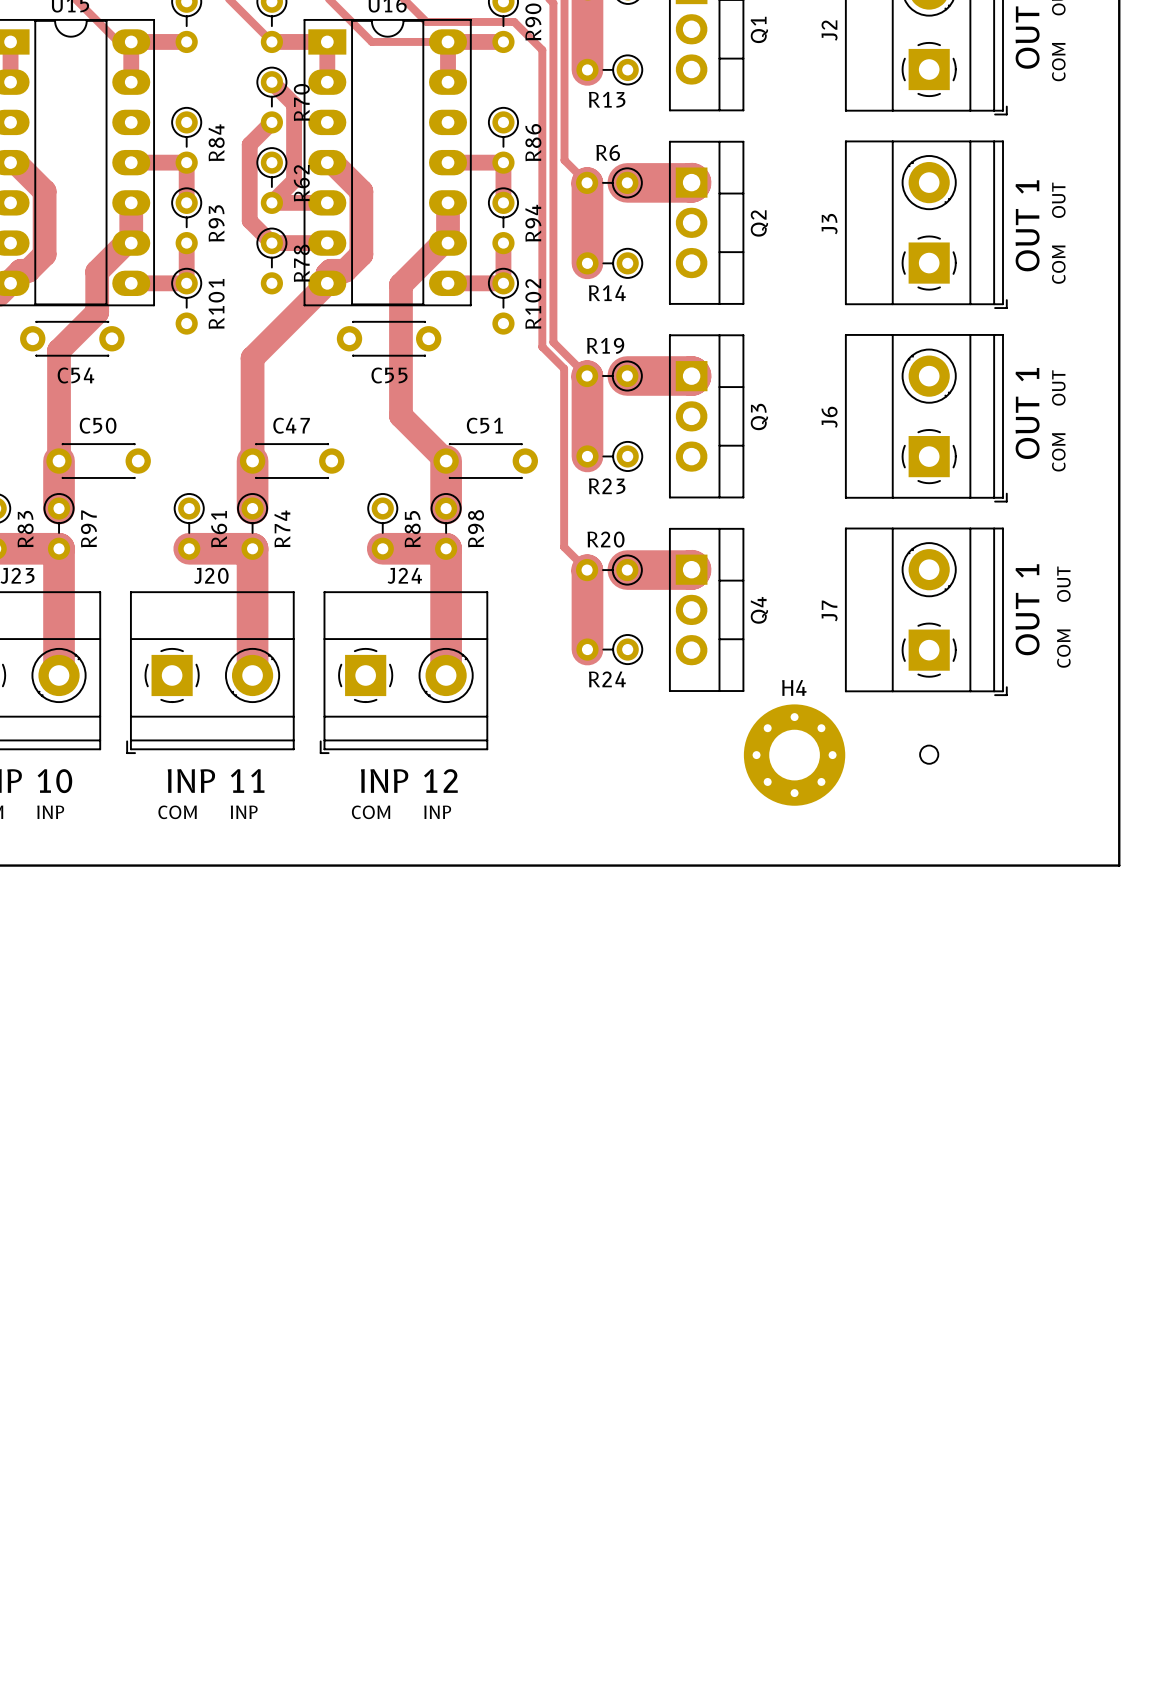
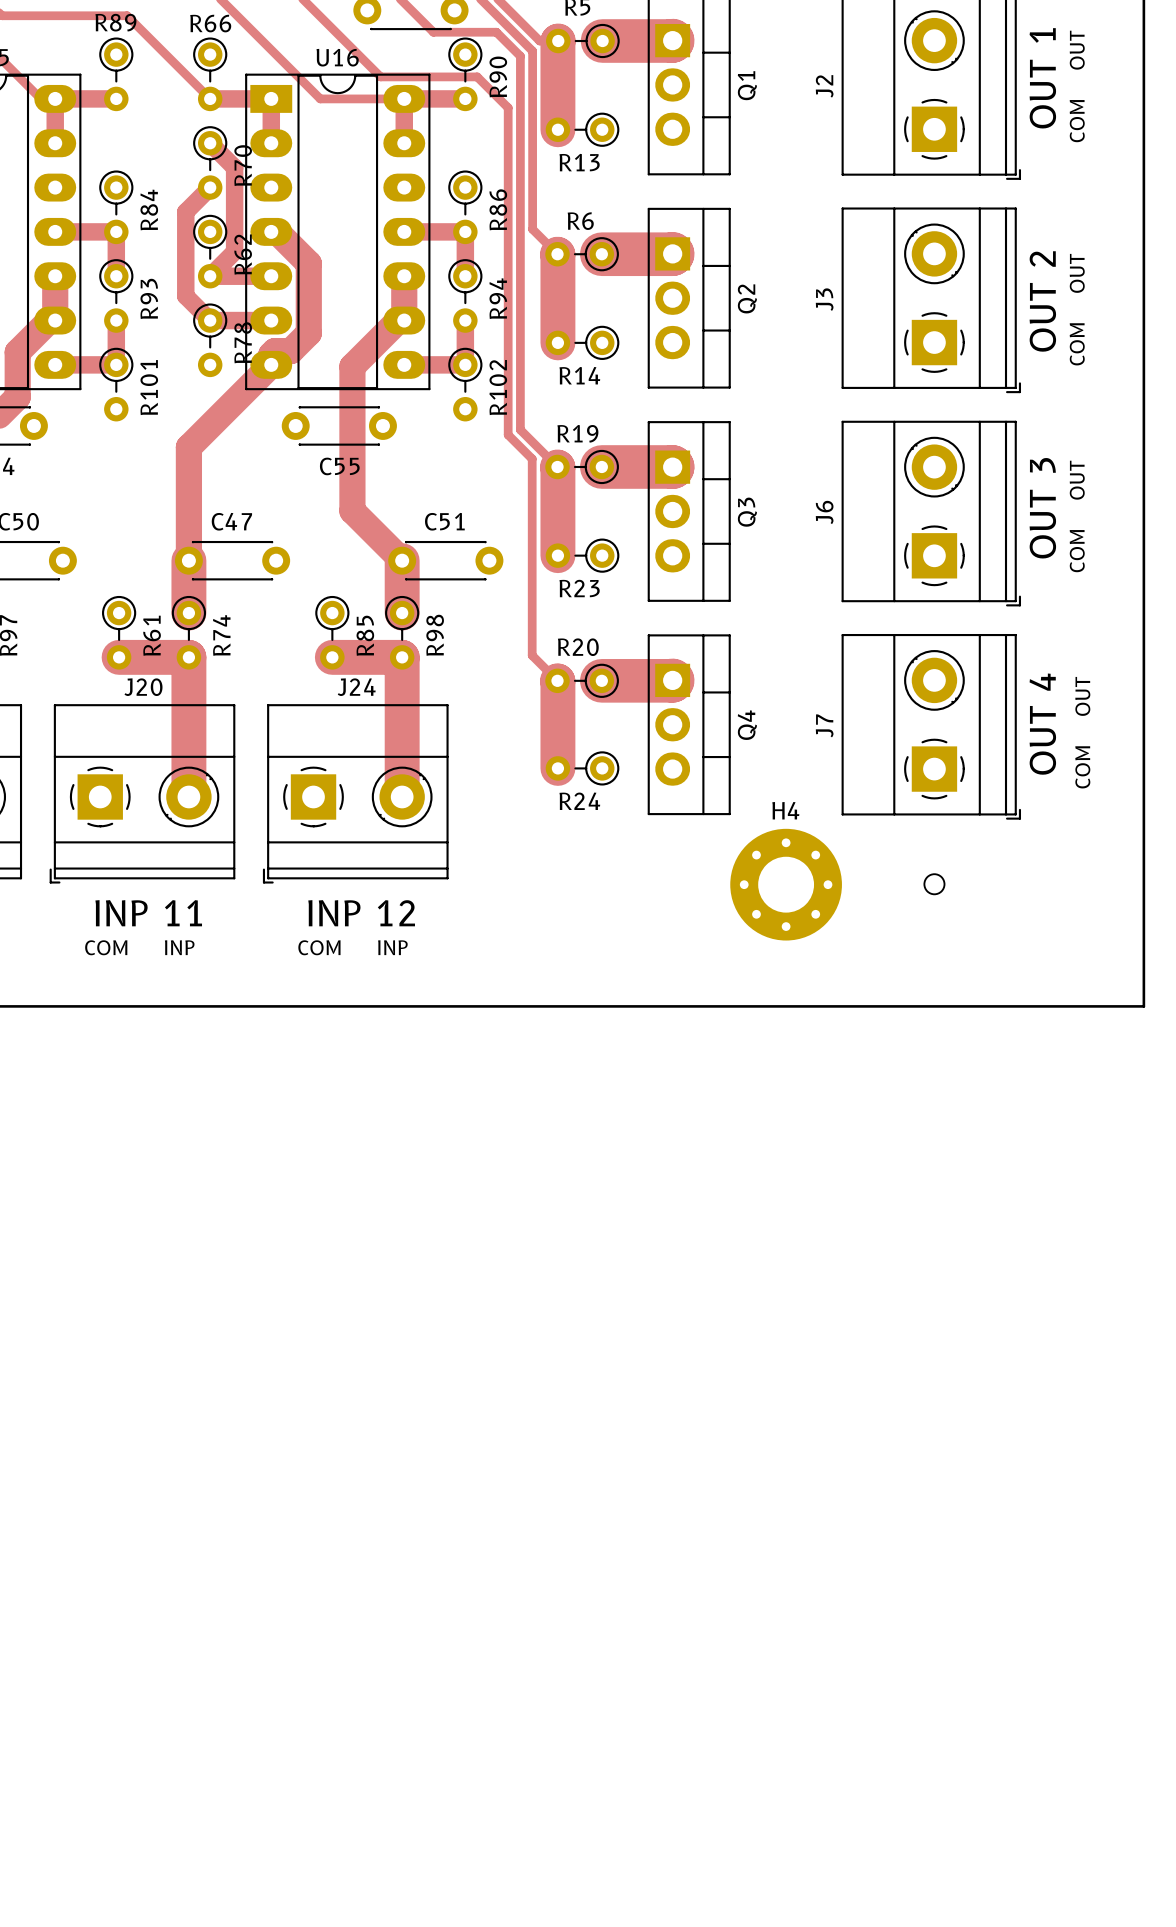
text: OUT 1 (1027, 225) -> OUT 2 (1042, 301)
text: OUT 1 (1027, 413) -> OUT 3 (1042, 508)
text: OUT 1 (1027, 609) -> OUT 4 (1042, 724)

